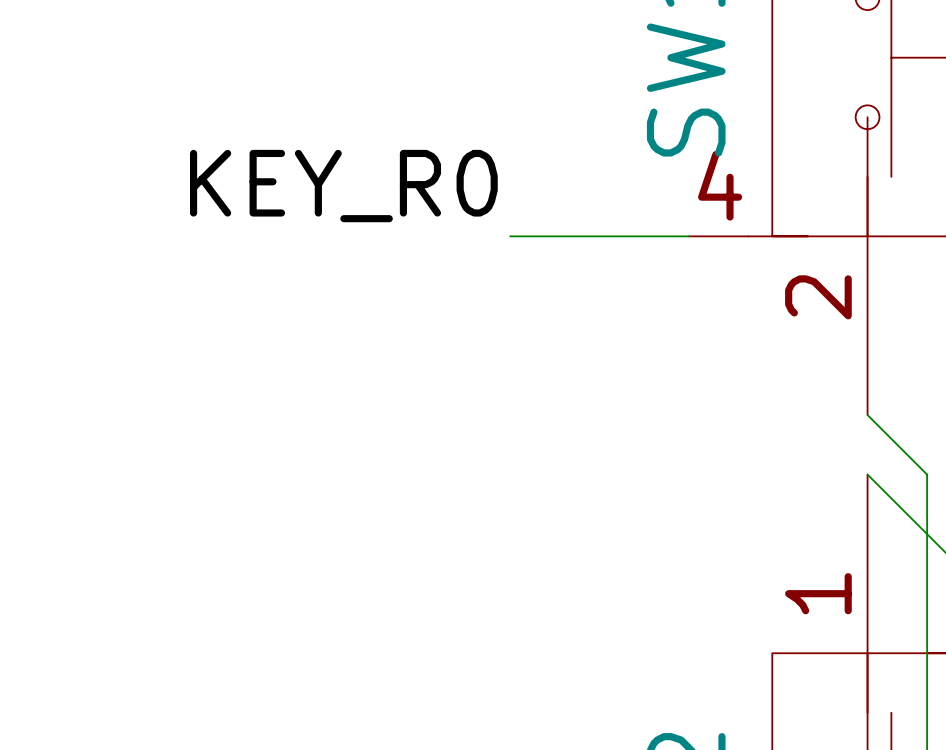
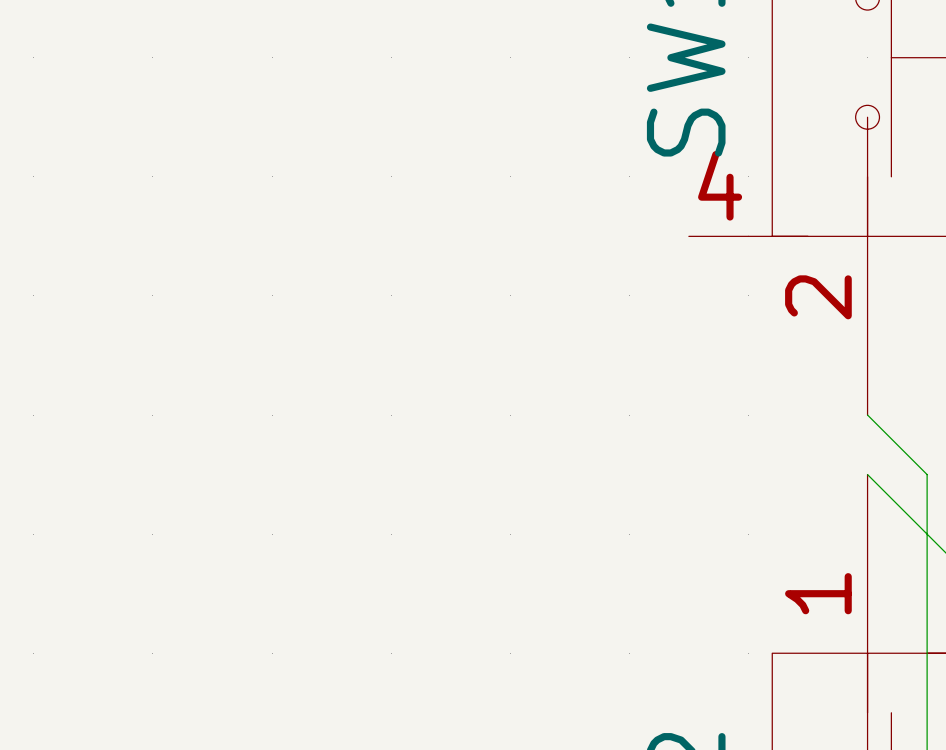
label: KEY_R0 (343, 186) -> none
wire: (510, 236) (688, 236) -> none

